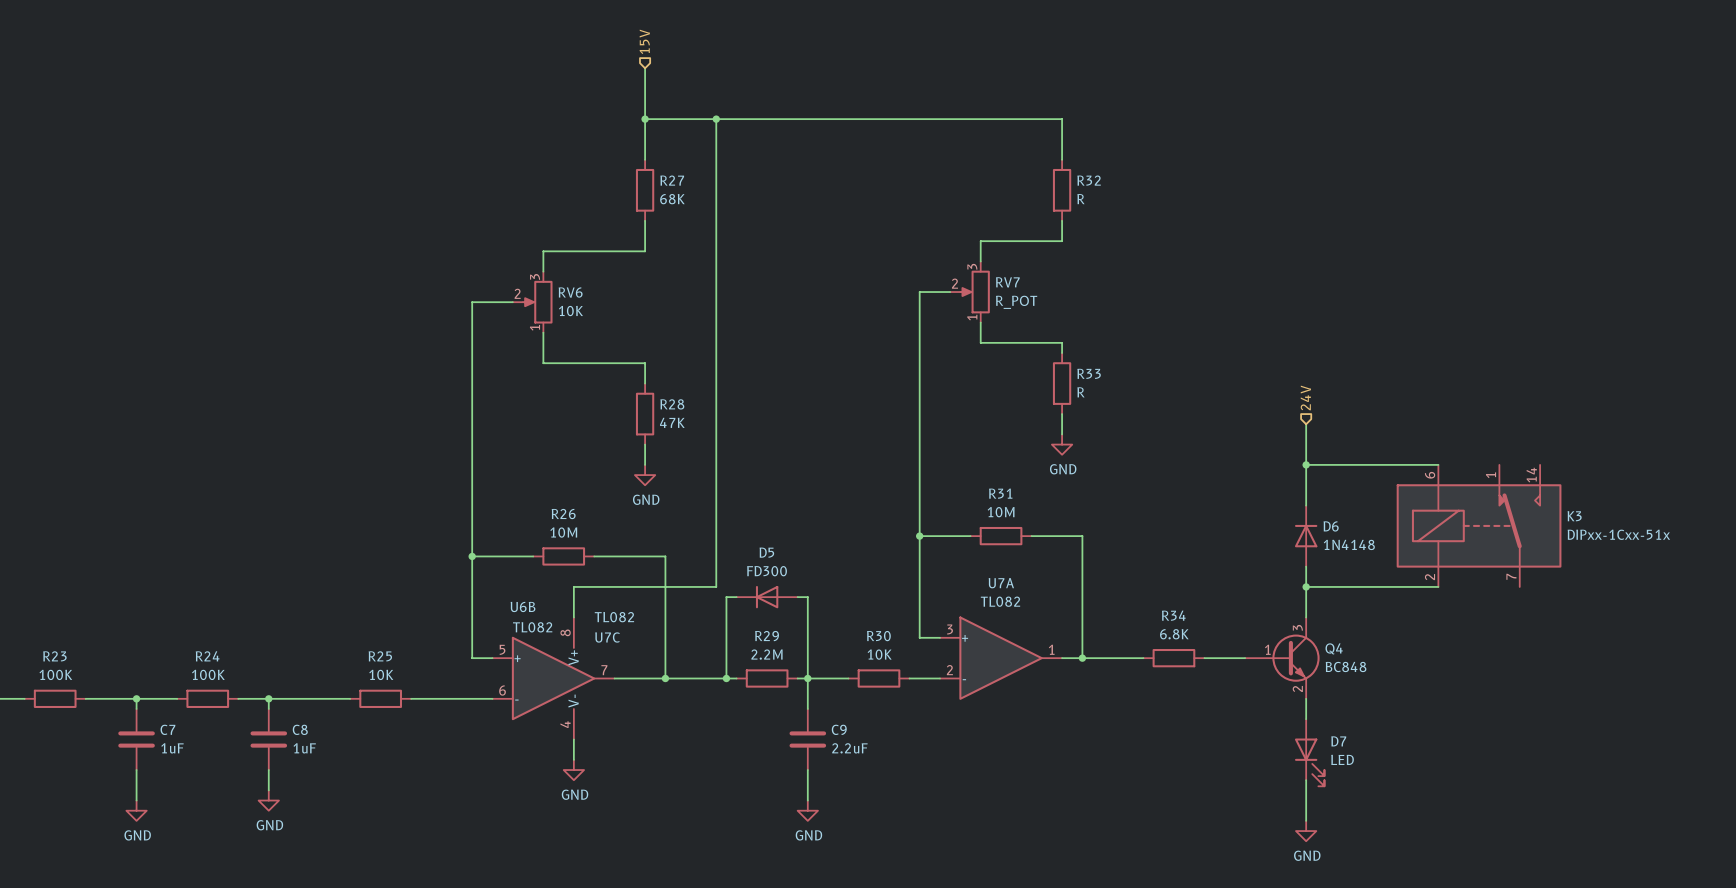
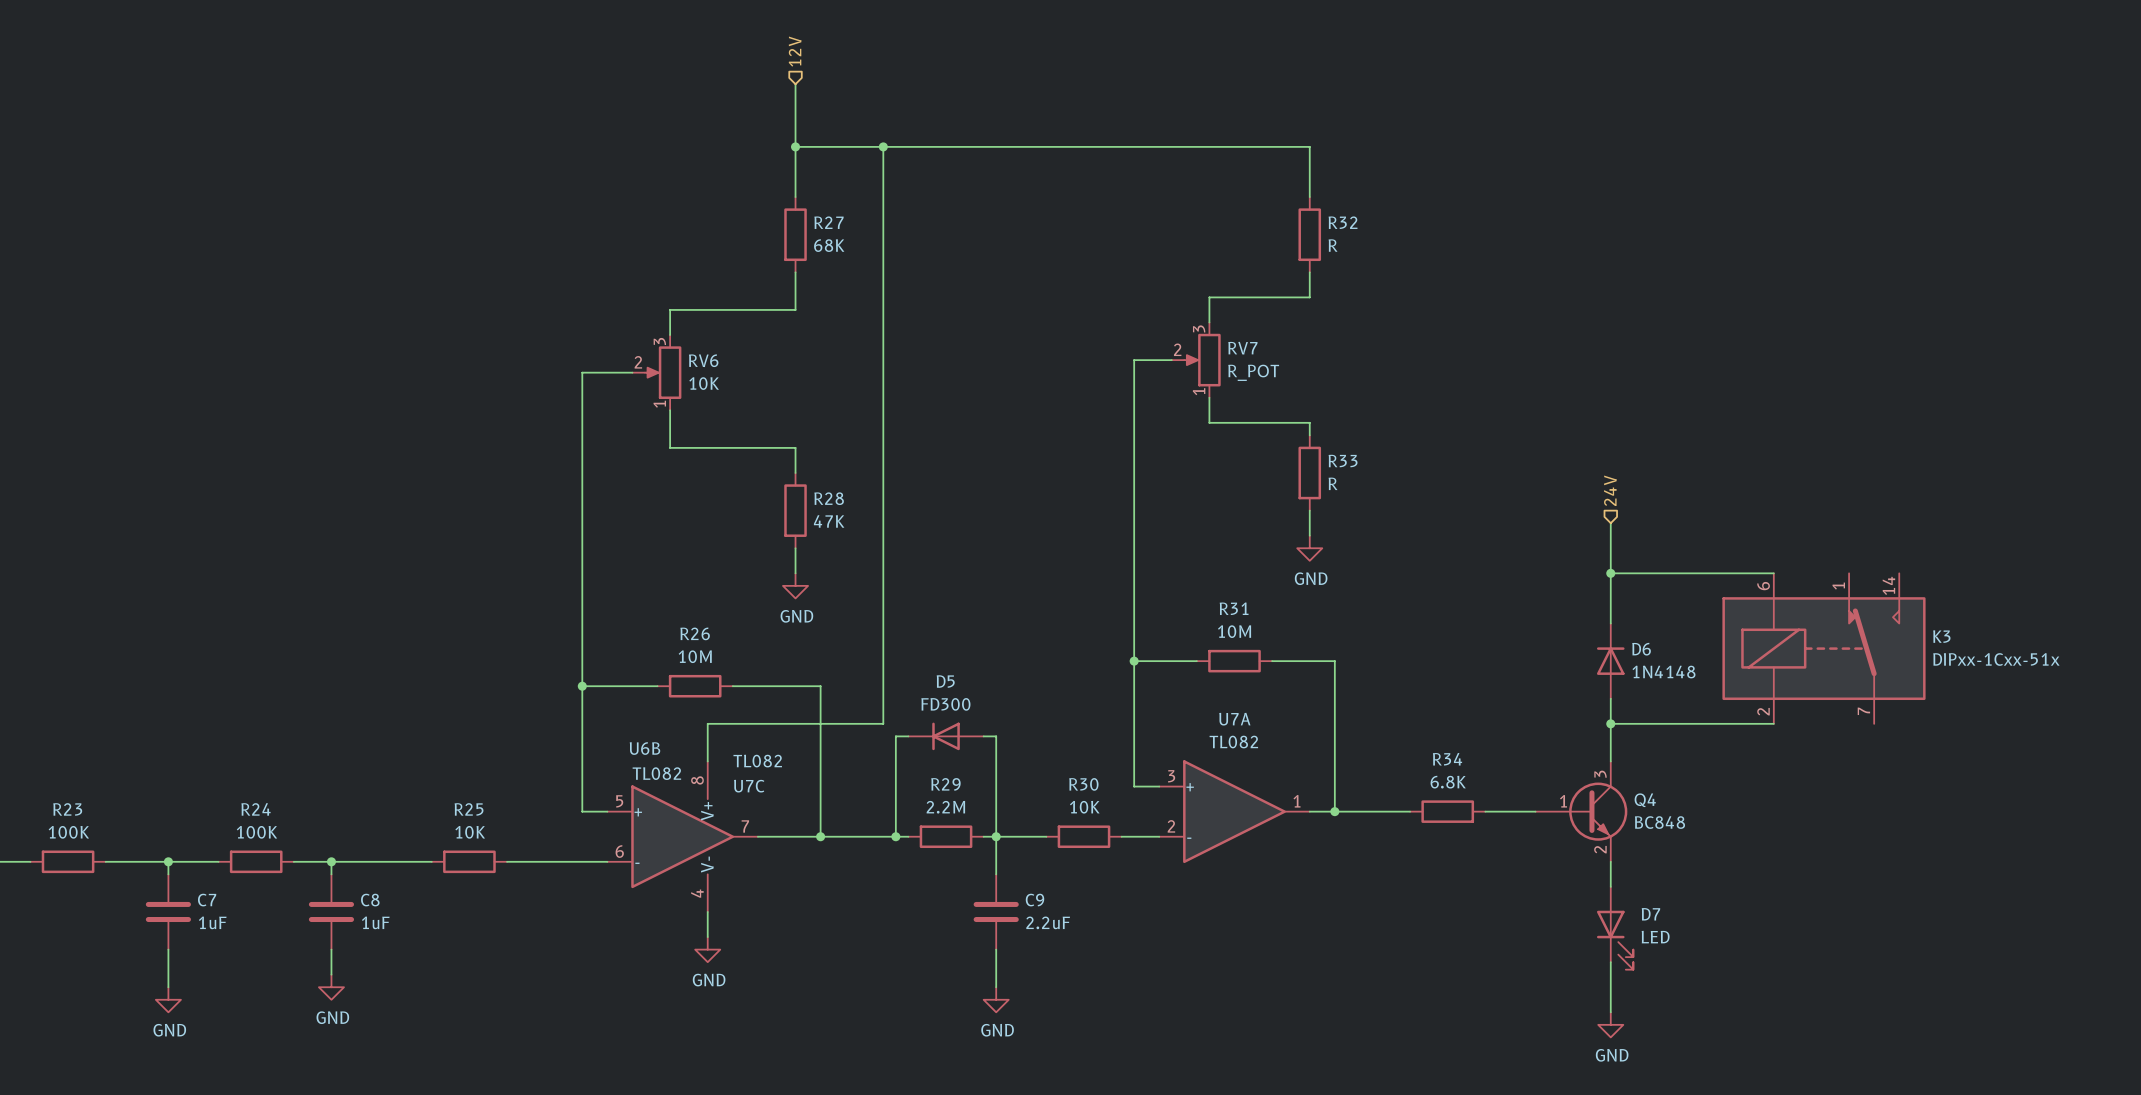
hierarchical label: 15V (644, 41) -> 12V (795, 51)

